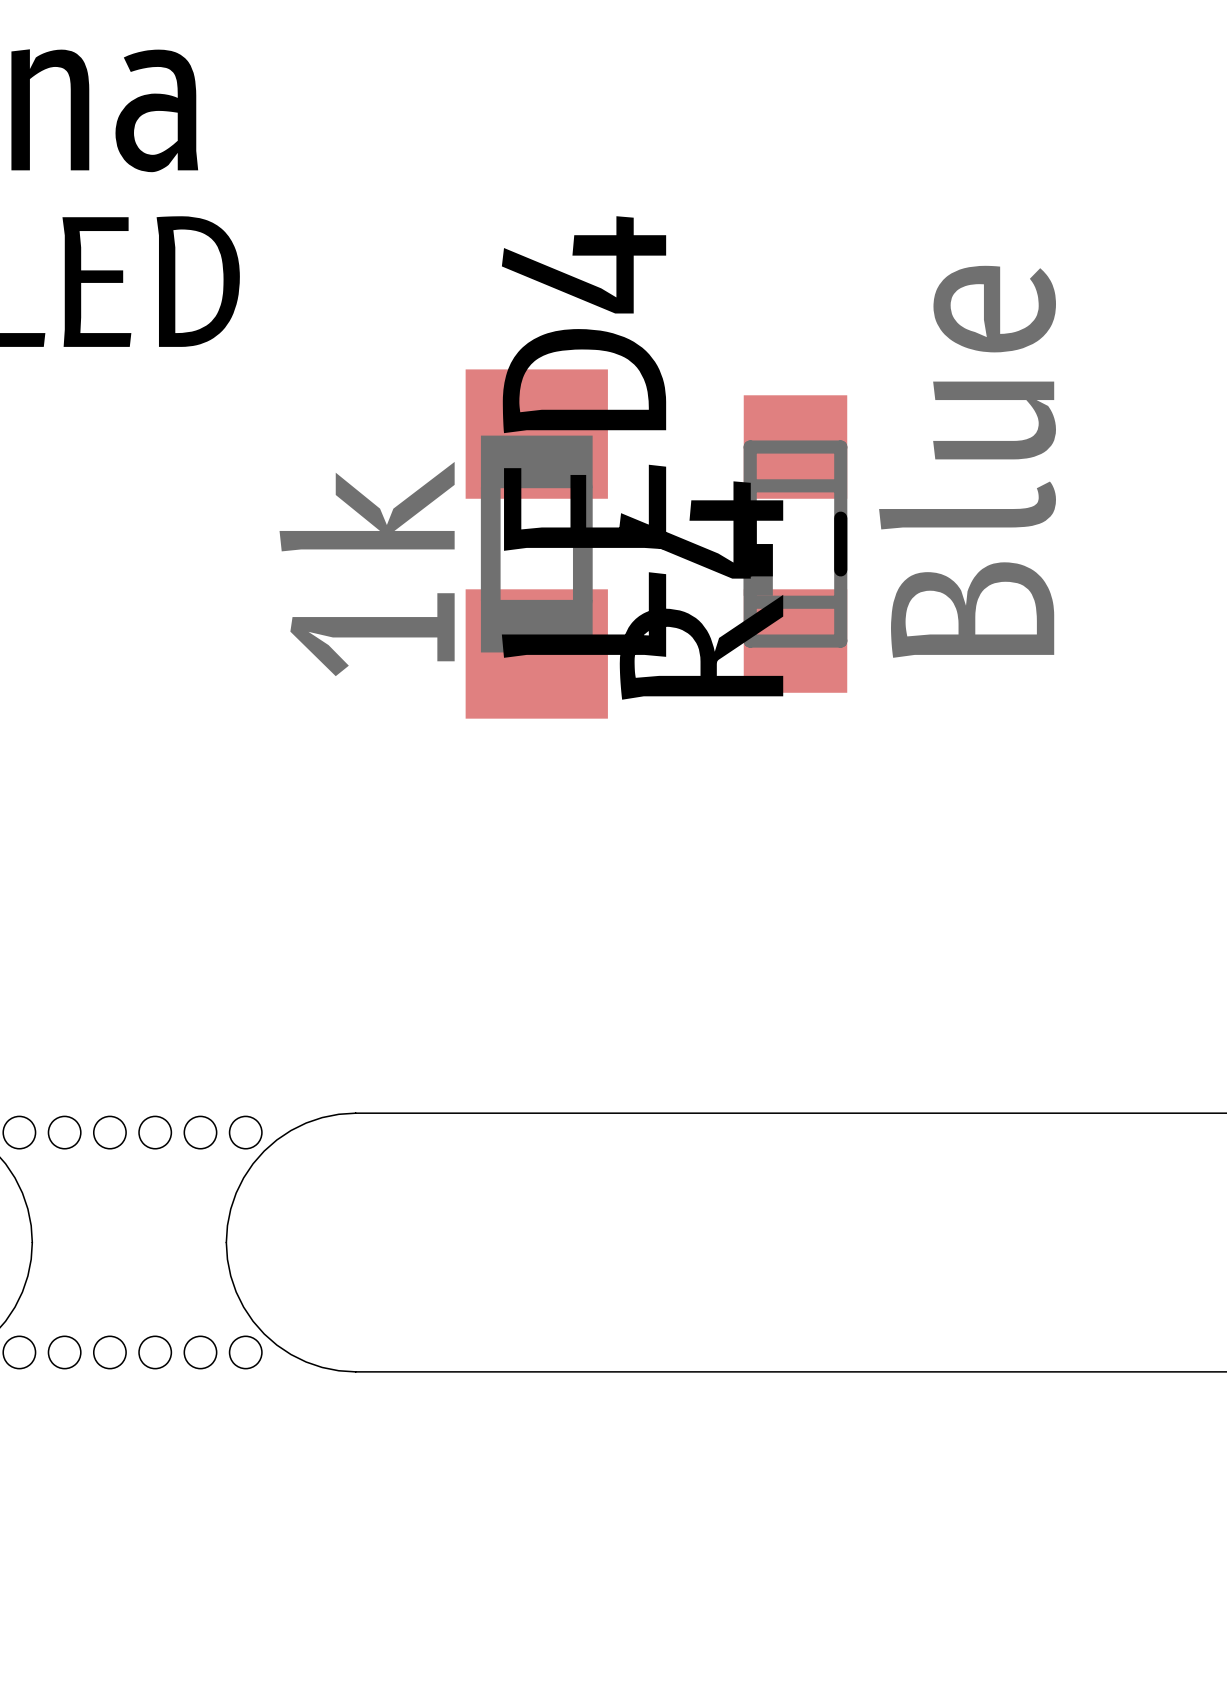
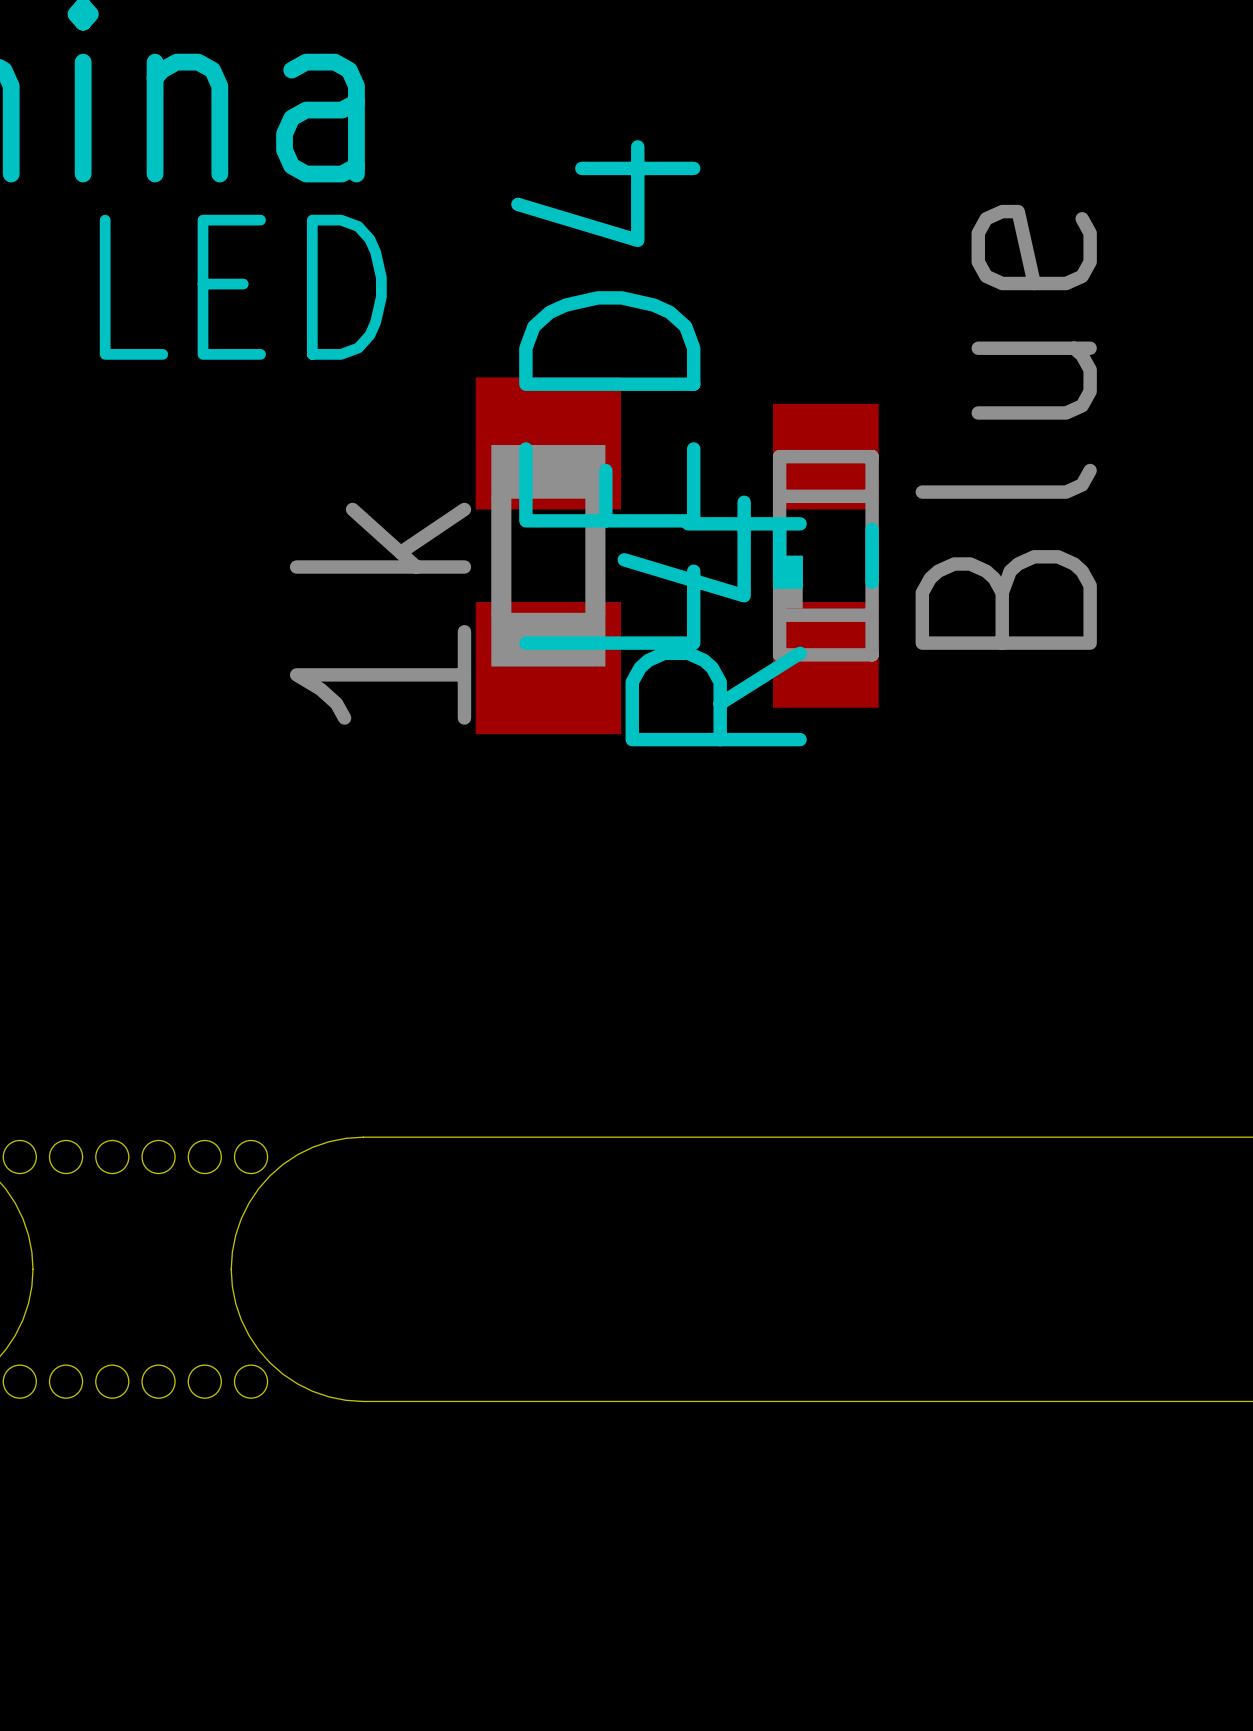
LED4 position: (795, 544) -> (825, 555)

